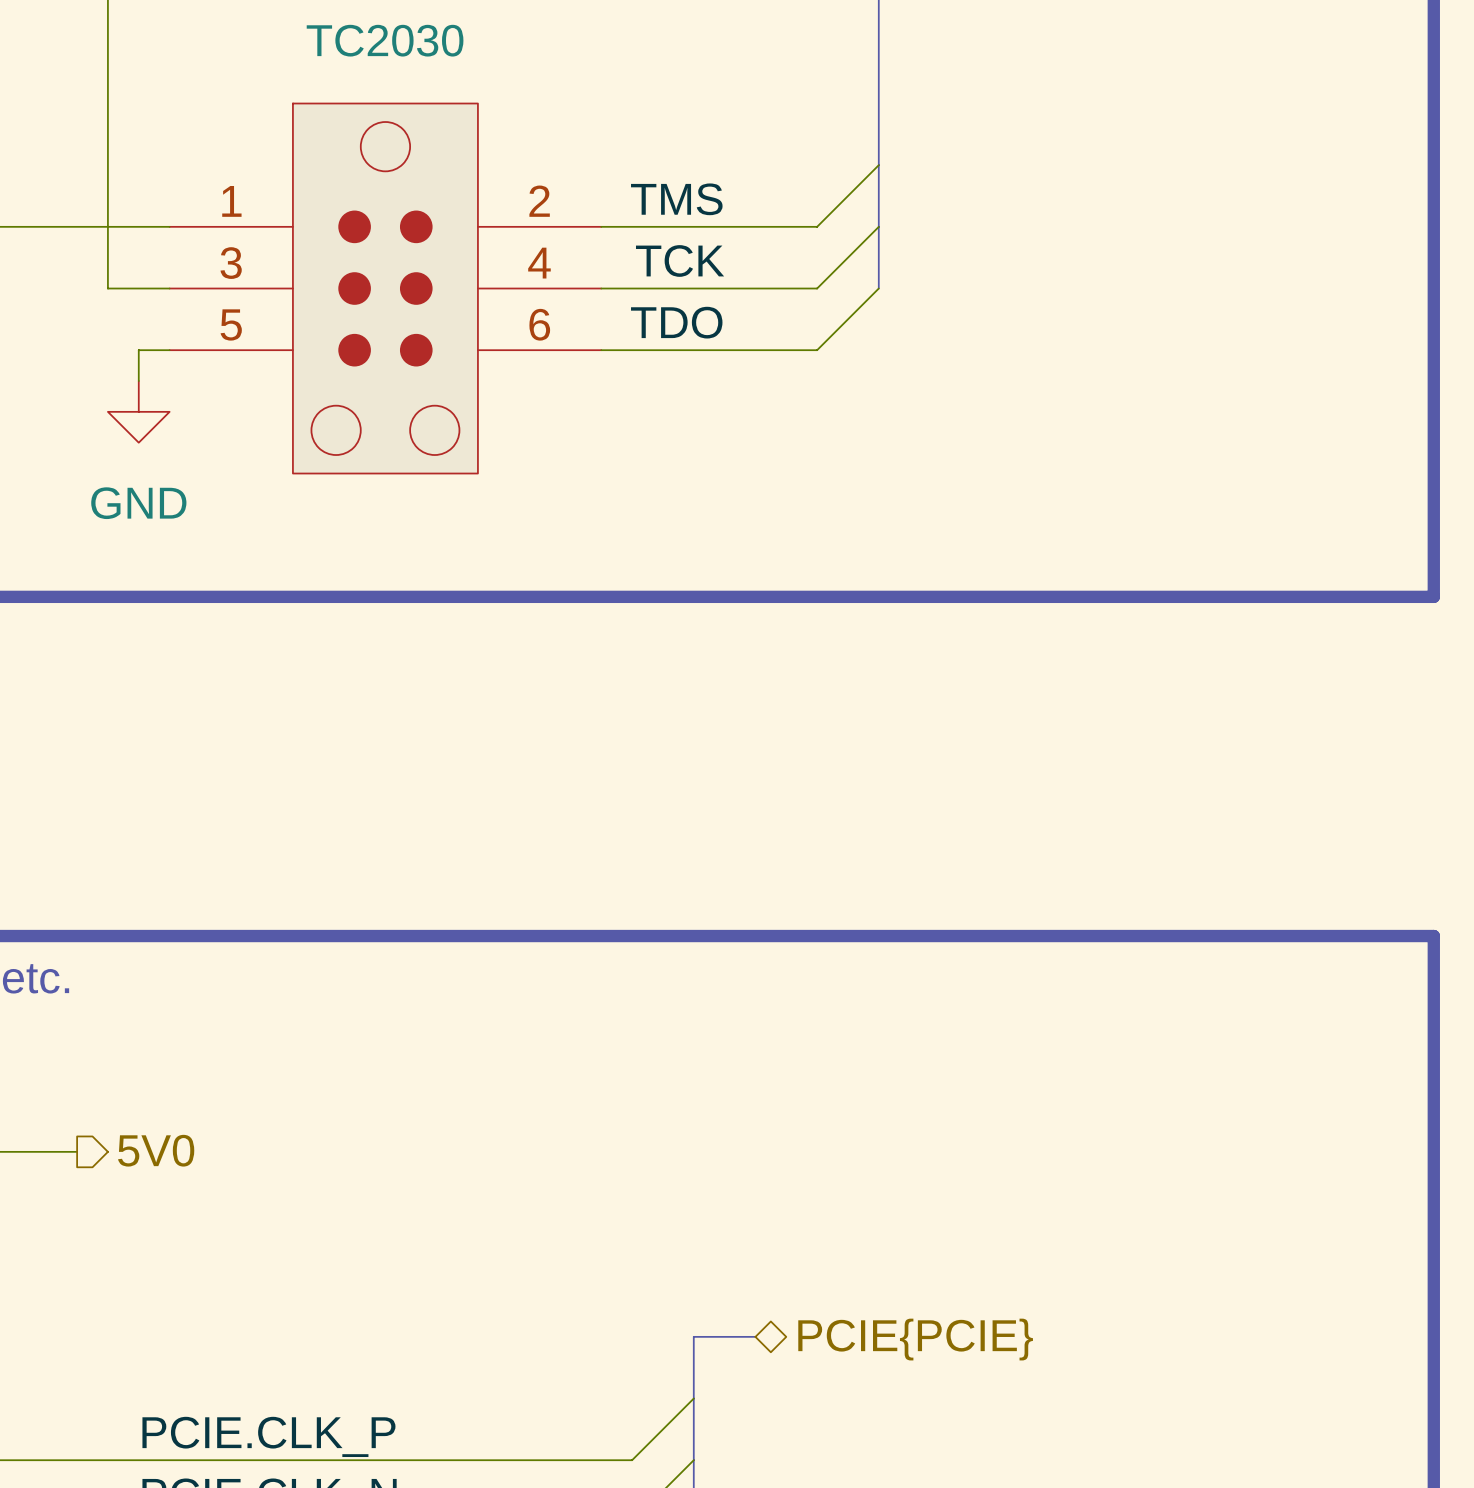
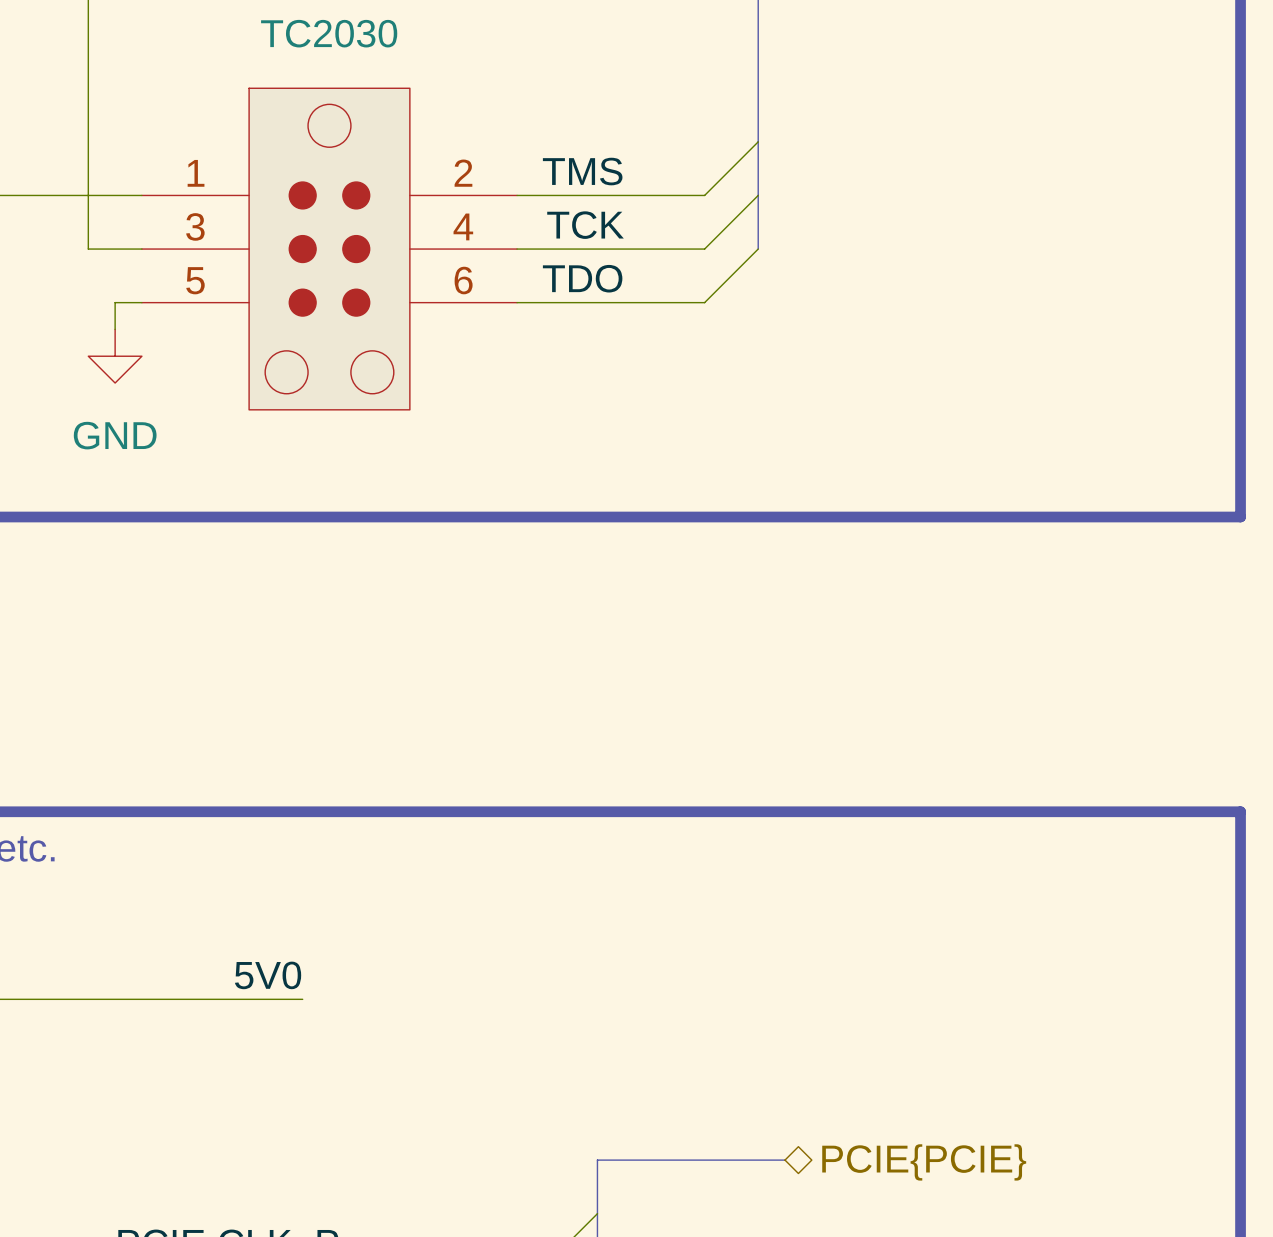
label: none -> 5V0 (268, 975)
hierarchical label: 5V0 (156, 1150) -> none
wire: none -> (61, 999) (302, 999)
bus: none -> (651, 1160) (785, 1160)
hierarchical label position: PCIE{PCIE} (915, 1339) -> PCIE{PCIE} (924, 1162)

